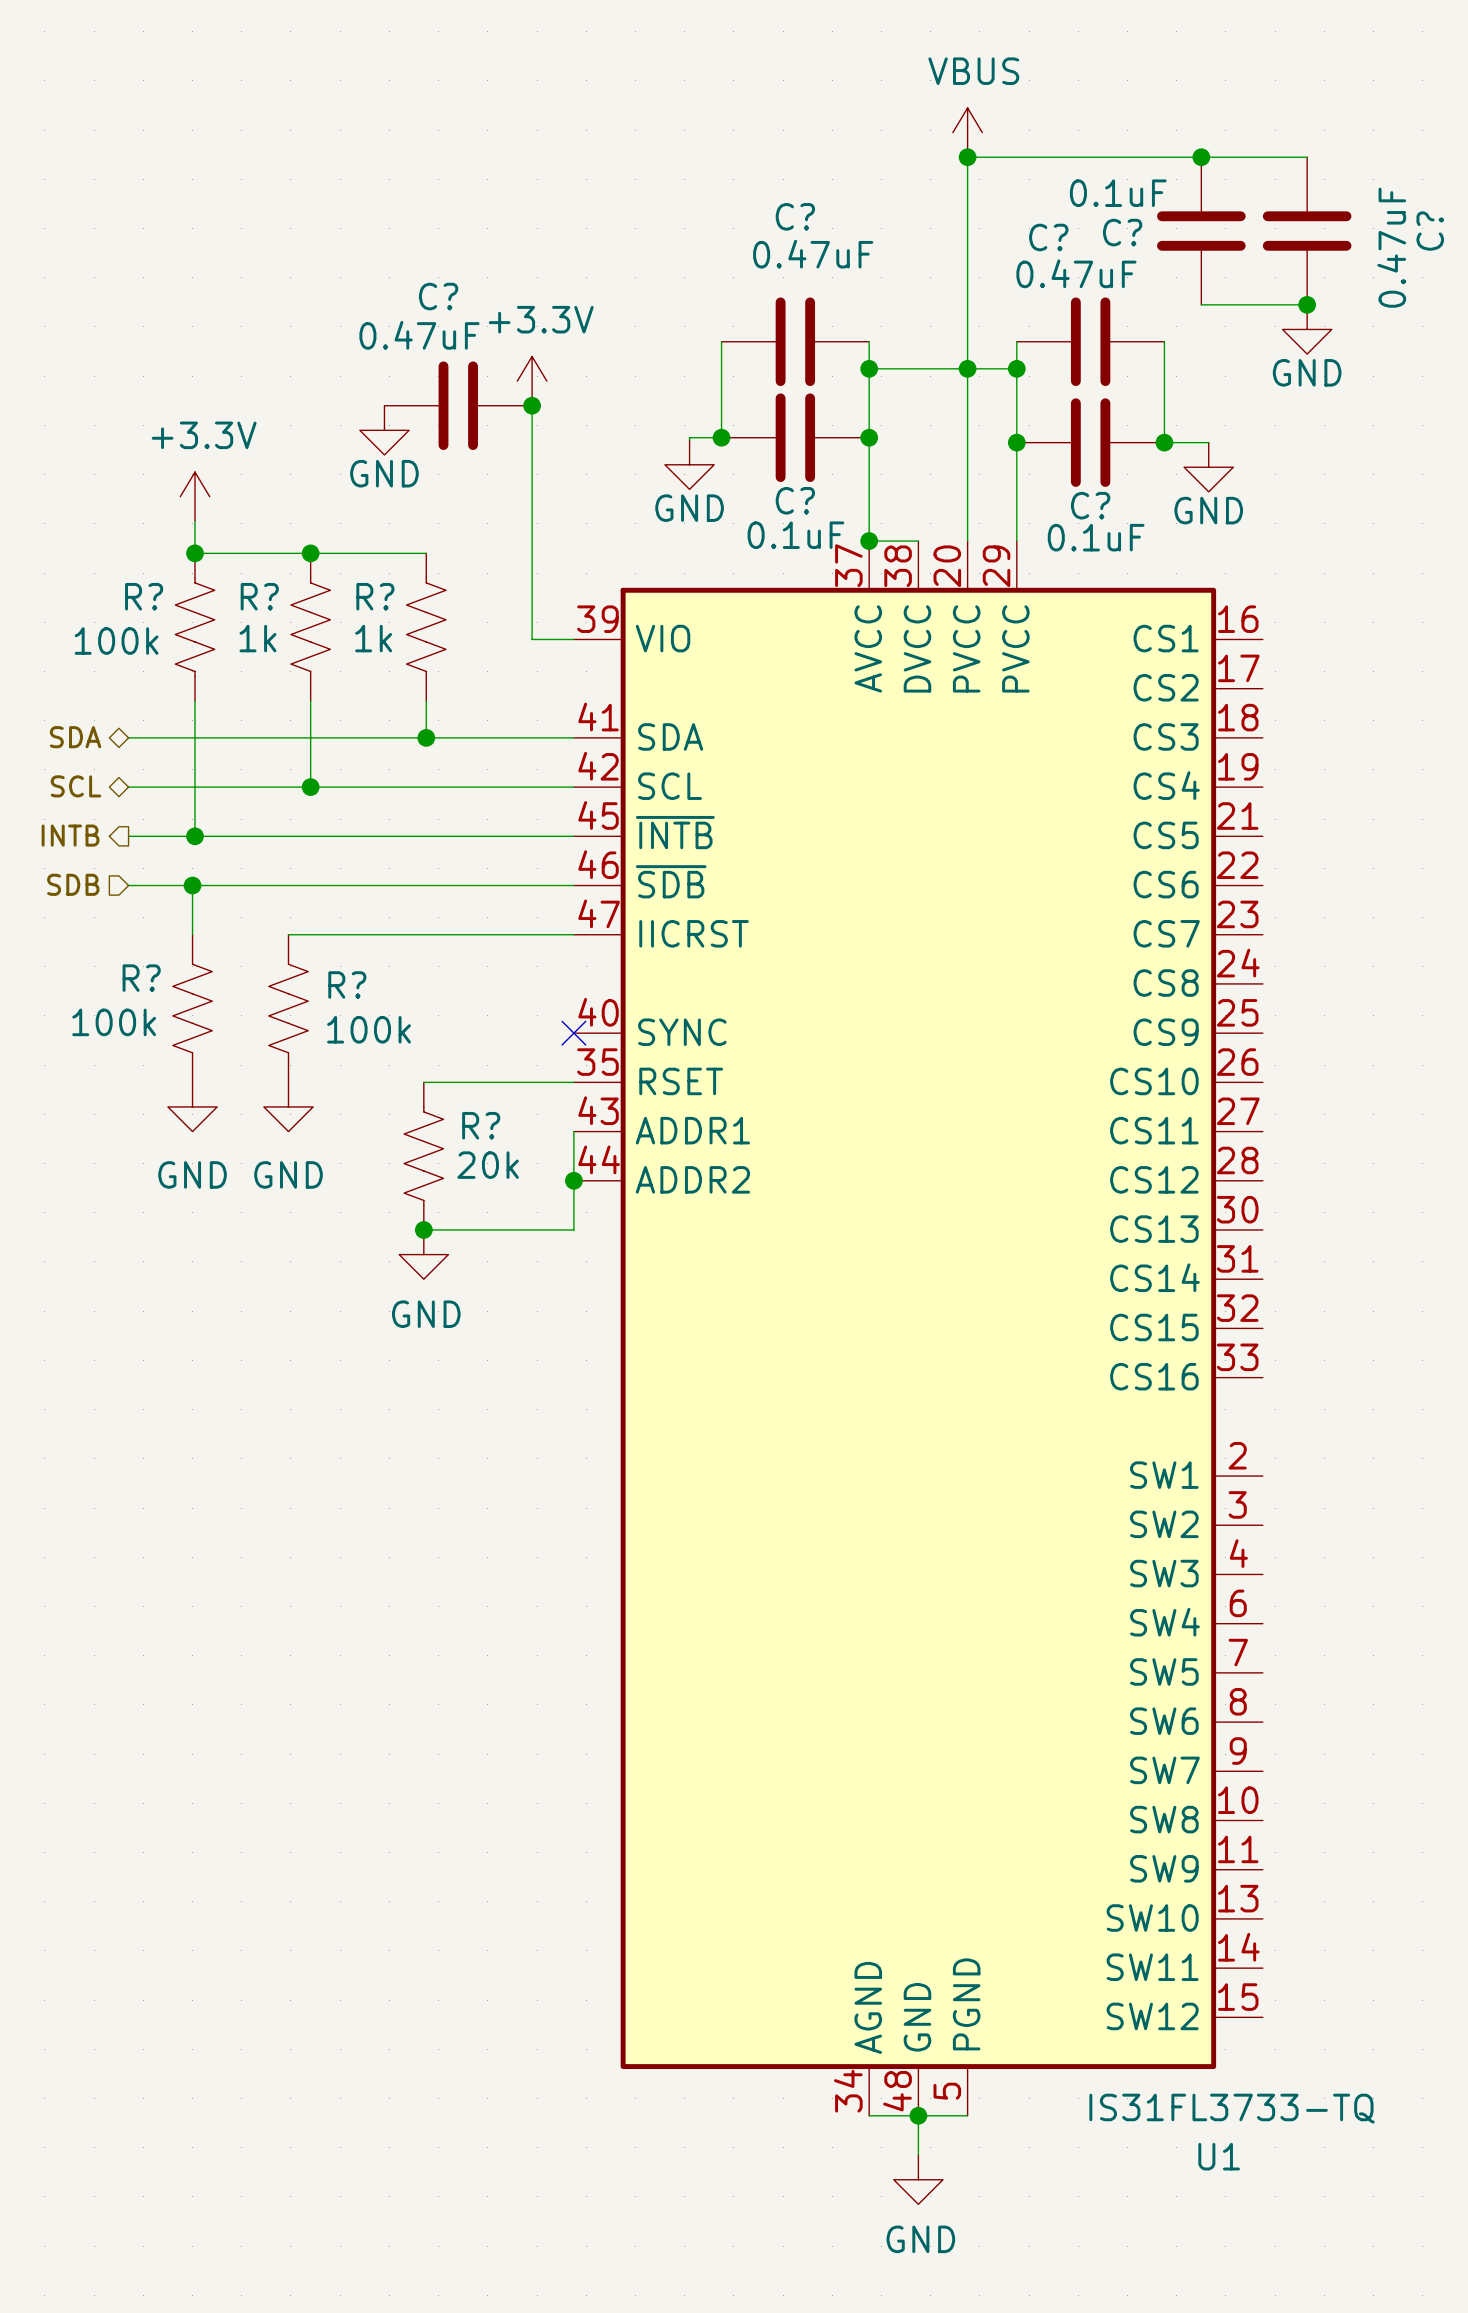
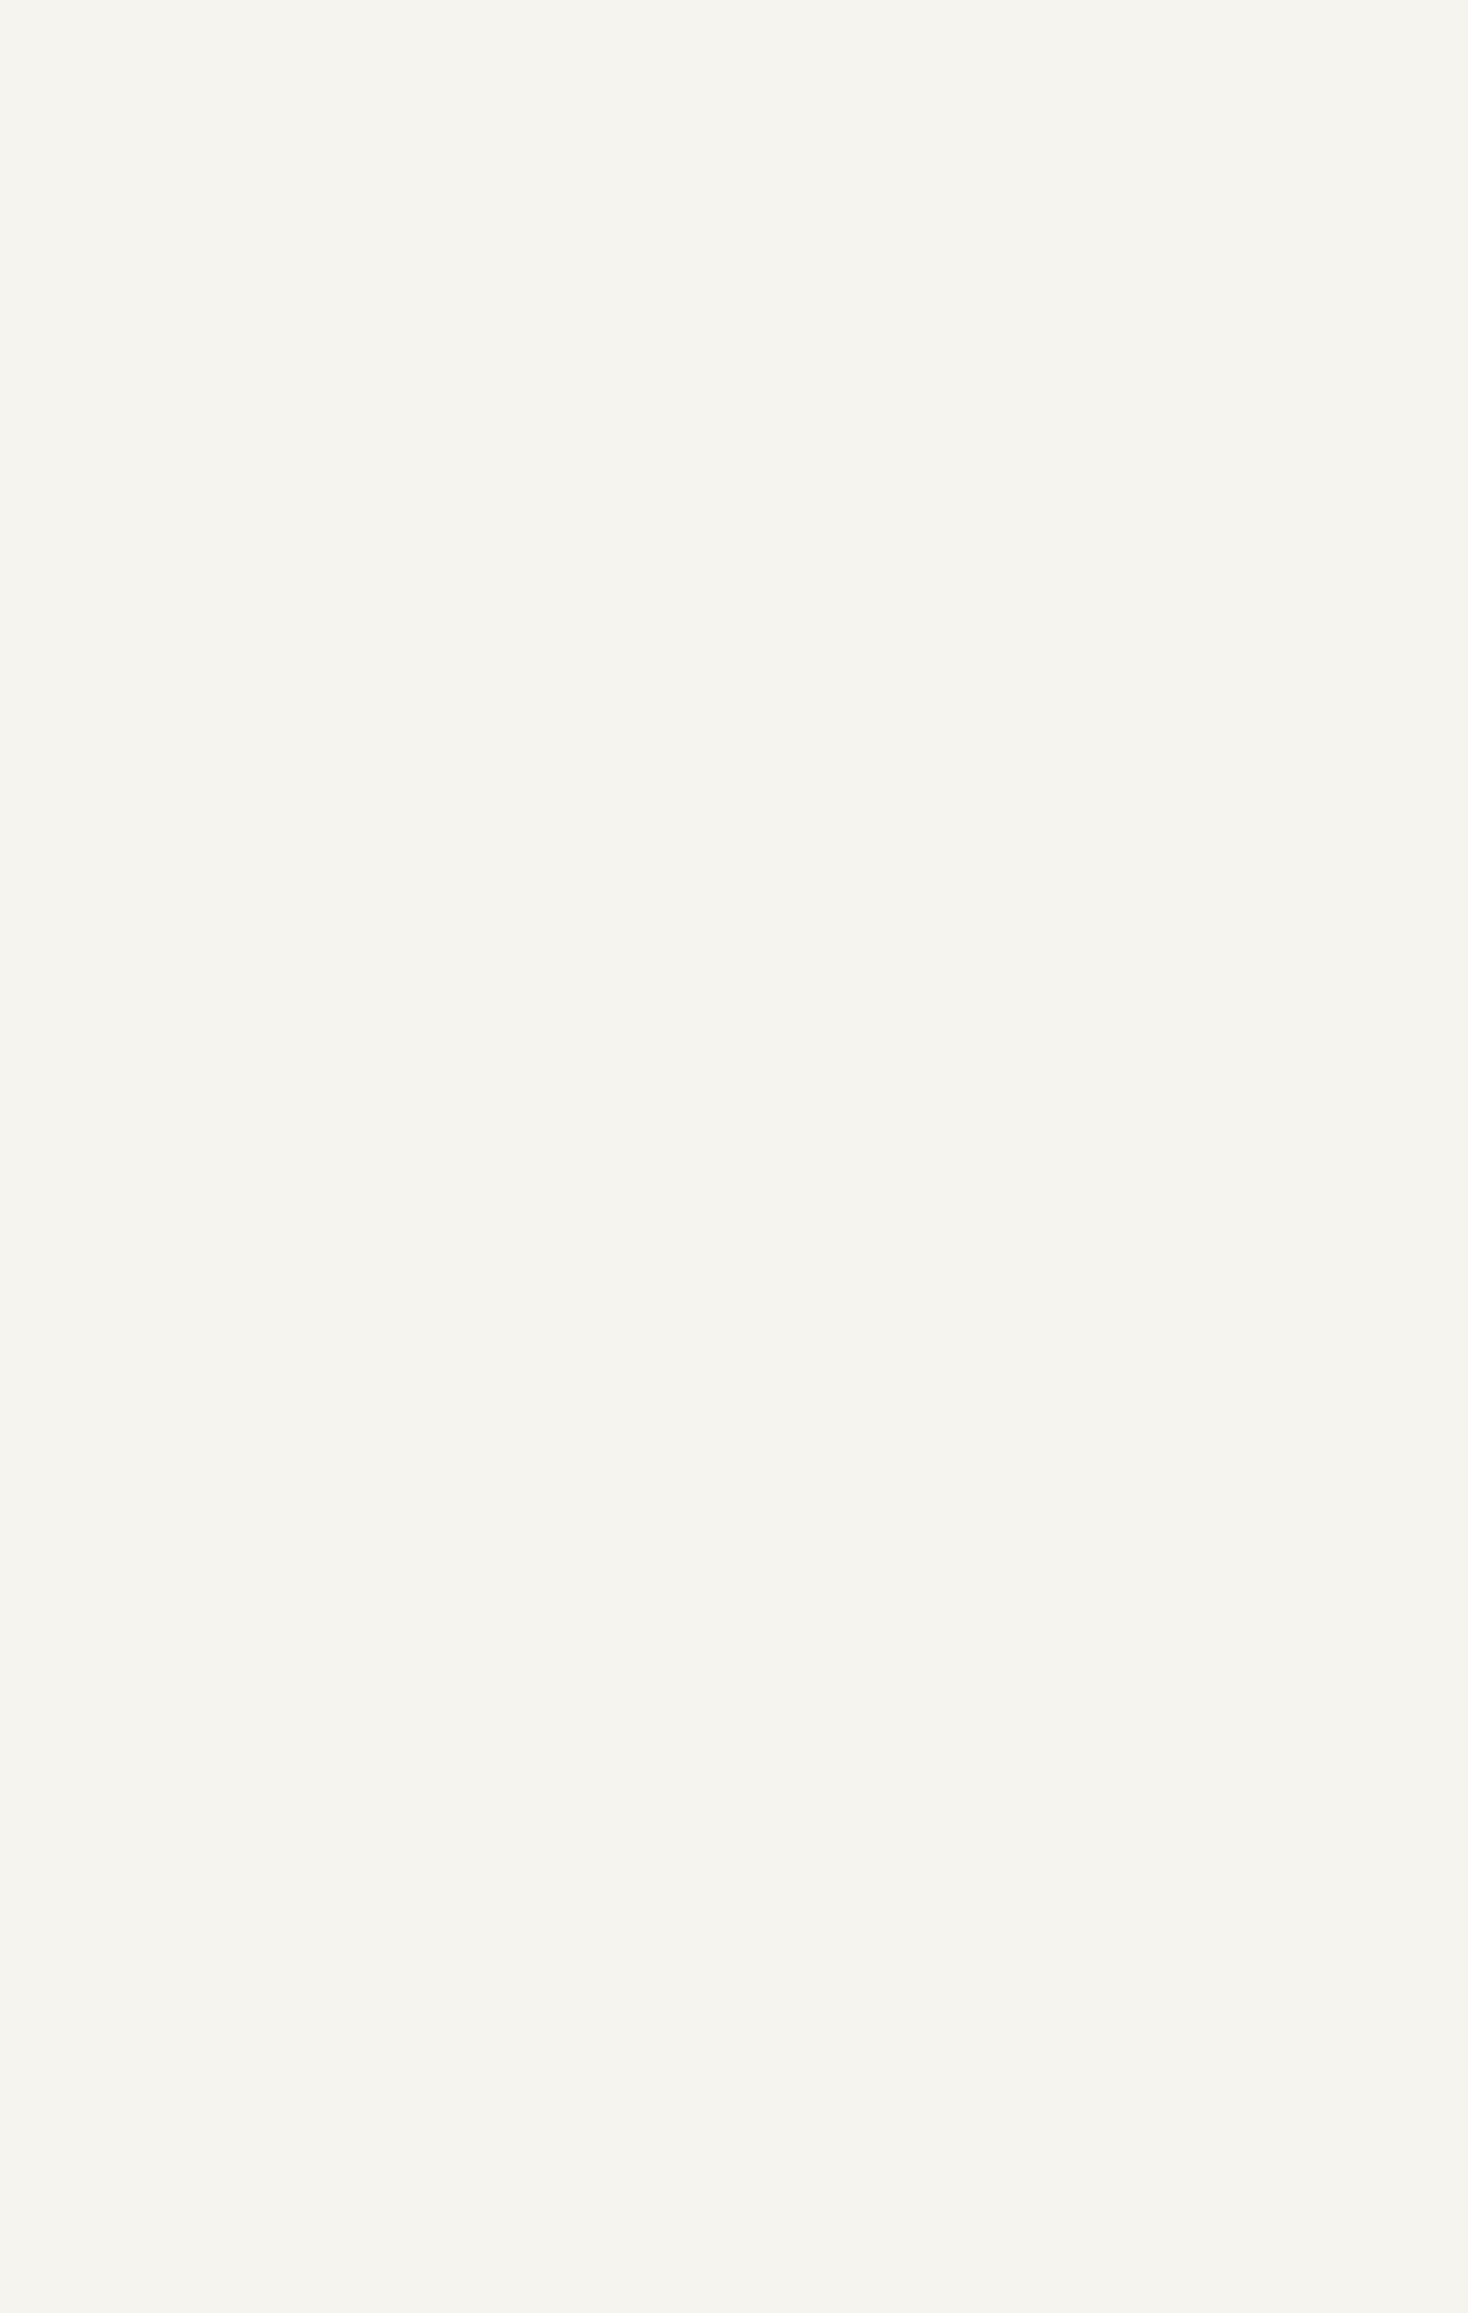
power symbol: VBUS (967, 132) -> none
junction: (967, 157) -> none
junction: (1201, 157) -> none
wire: (1307, 157) (967, 157) (967, 541) -> none
C?: 0.1uF (1201, 231) -> none
C?: 0.47uF (1307, 231) -> none
wire: (1201, 304) (1307, 304) -> none
junction: (1307, 304) -> none
power symbol: GND (1307, 329) -> none
wire: (721, 341) (721, 437) (689, 437) (689, 440) -> none
C?: 0.47uF (795, 341) -> none
wire: (869, 341) (869, 541) (918, 541) -> none
wire: (1016, 341) (1016, 541) -> none
C?: 0.47uF (1090, 341) -> none
wire: (1164, 341) (1164, 442) (1208, 442) -> none
wire: (869, 368) (1016, 368) -> none
junction: (869, 368) -> none
junction: (967, 368) -> none
junction: (1016, 368) -> none
power symbol: +3.3V (532, 381) -> none
C?: 0.47uF (458, 405) -> none
wire: (532, 405) (532, 639) (573, 639) -> none
junction: (532, 405) -> none
power symbol: GND (384, 430) -> none
junction: (721, 437) -> none
C?: 0.1uF (795, 437) -> none
junction: (869, 437) -> none
junction: (1016, 442) -> none
C?: 0.1uF (1090, 442) -> none
junction: (1164, 442) -> none
power symbol: GND (689, 464) -> none
power symbol: GND (1208, 467) -> none
power symbol: +3.3V (195, 496) -> none
wire: (195, 521) (195, 553) (426, 553) -> none
junction: (869, 541) -> none
junction: (195, 553) -> none
junction: (310, 553) -> none
R?: 100k (195, 627) -> none
R?: 1k (310, 627) -> none
R?: 1k (426, 627) -> none
wire: (195, 700) (195, 836) -> none
wire: (310, 700) (310, 787) -> none
wire: (426, 700) (426, 737) -> none
hierarchical label: SDA (75, 737) -> none
wire: (128, 737) (573, 737) -> none
junction: (426, 737) -> none
hierarchical label: SCL (76, 786) -> none
wire: (128, 787) (573, 787) -> none
junction: (310, 787) -> none
hierarchical label: INTB (70, 835) -> none
wire: (128, 836) (573, 836) -> none
junction: (195, 836) -> none
hierarchical label: SDB (73, 884) -> none
wire: (128, 885) (573, 885) -> none
wire: (192, 885) (192, 934) -> none
junction: (192, 885) -> none
wire: (288, 934) (573, 934) -> none
R?: 100k (192, 1008) -> none
R?: 100k (288, 1008) -> none
no-connect mark: (573, 1033) -> none
wire: (423, 1082) (573, 1082) -> none
power symbol: GND (192, 1106) -> none
power symbol: GND (288, 1106) -> none
wire: (573, 1131) (573, 1229) (423, 1229) -> none
R?: 20k (423, 1156) -> none
junction: (573, 1180) -> none
junction: (423, 1229) -> none
power symbol: GND (423, 1254) -> none
U1: IS31FL3733-TQ (918, 1328) -> none
wire: (869, 2115) (967, 2115) -> none
wire: (918, 2115) (918, 2155) -> none
junction: (918, 2115) -> none
power symbol: GND (918, 2179) -> none

